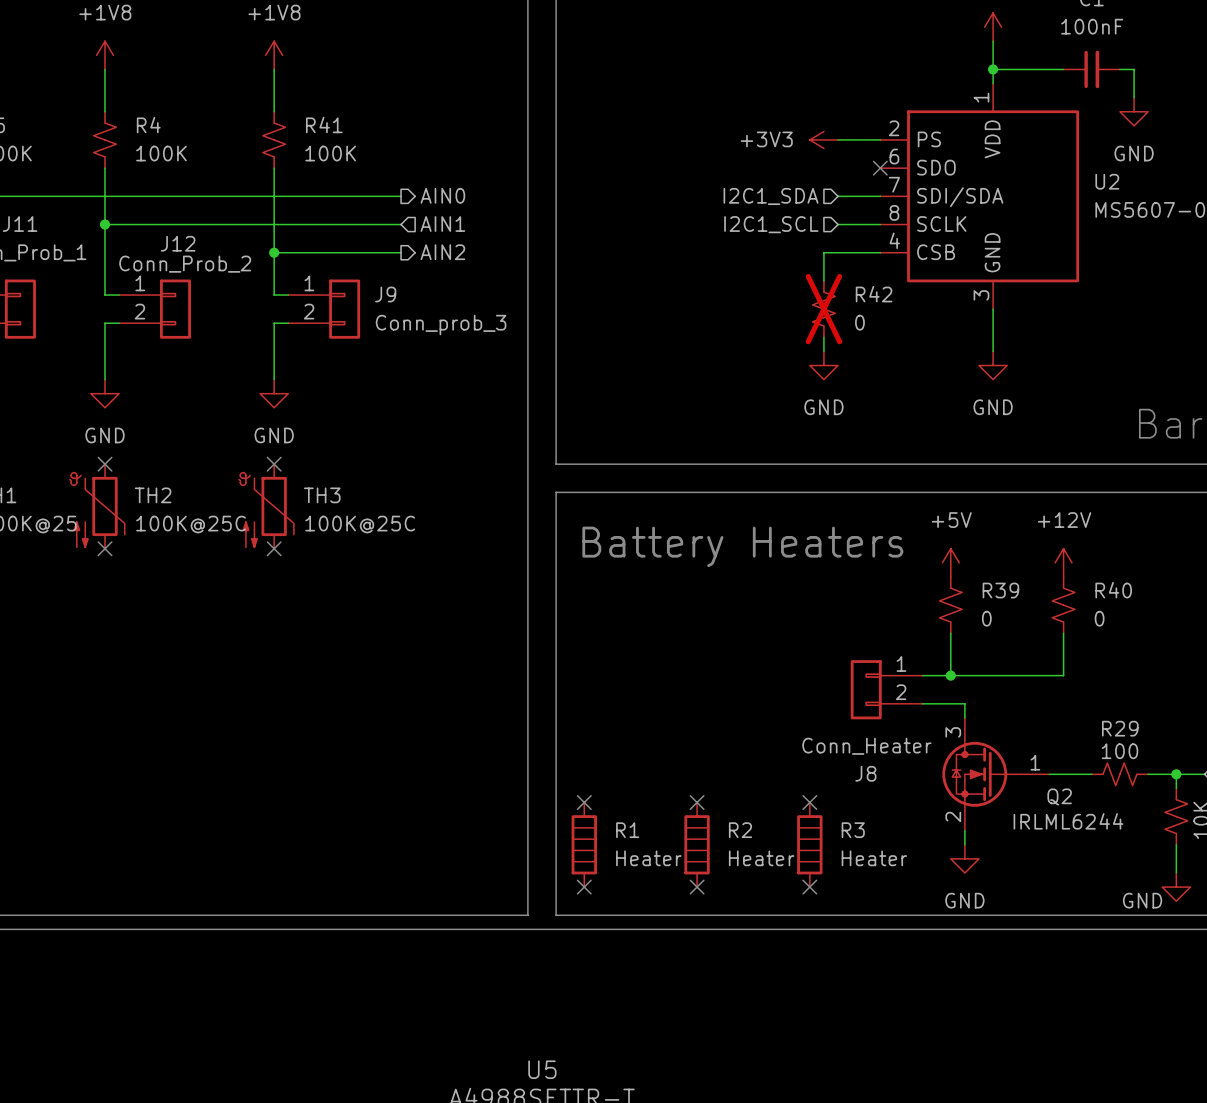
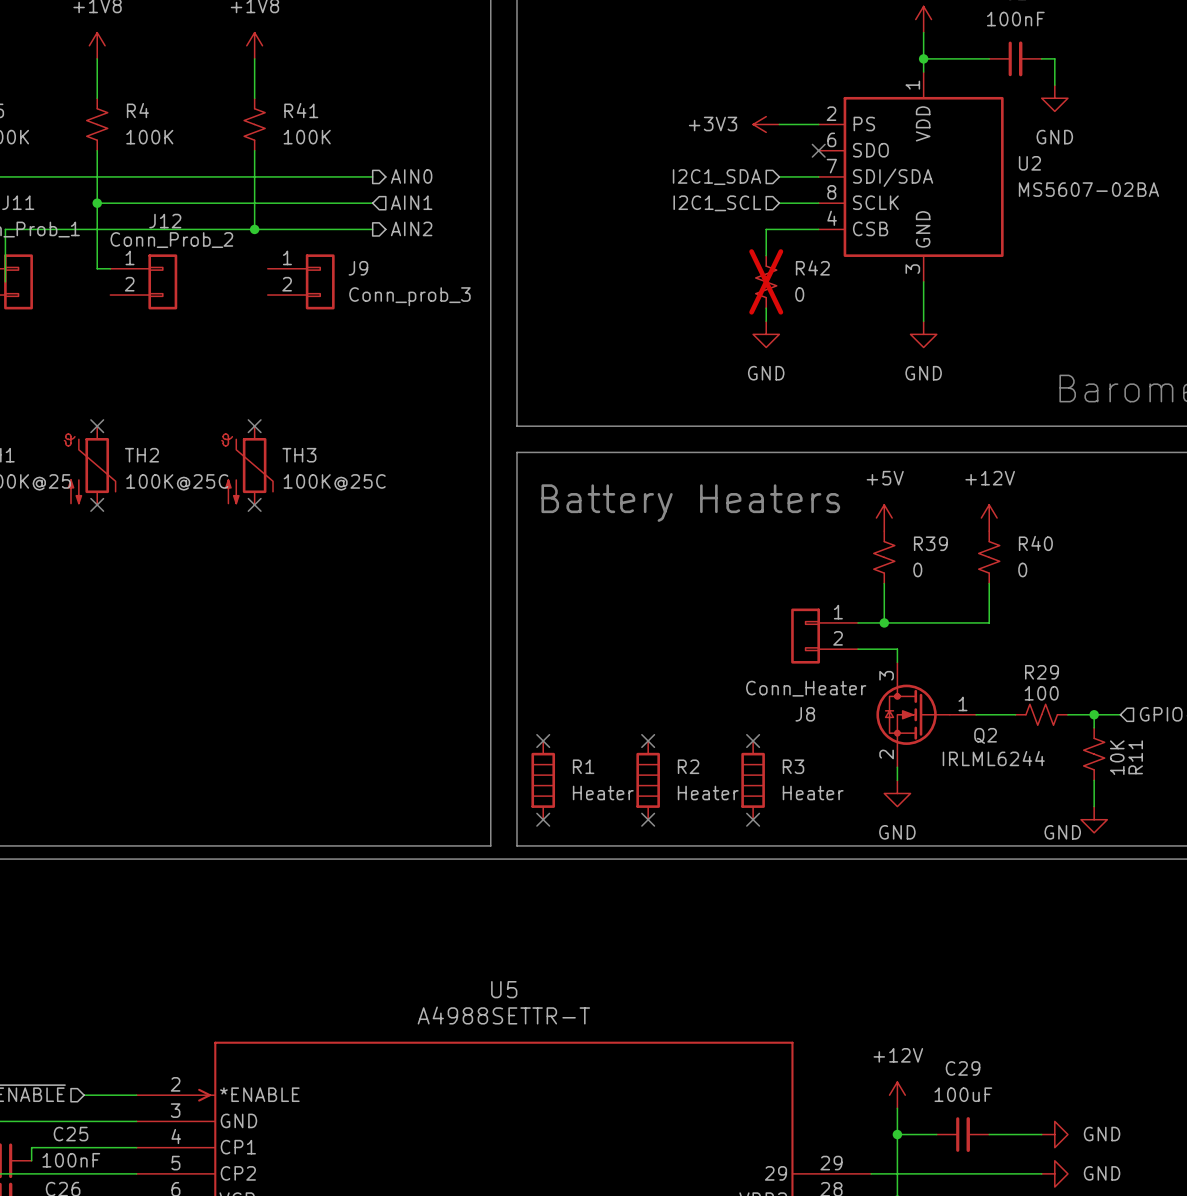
wire: (274, 252) (274, 295) (288, 295) -> (254, 229) (5, 229) (5, 281)
wire: (119, 323) (105, 323) (105, 379) -> none
wire: (288, 323) (274, 323) (274, 379) -> none
power symbol: GND (105, 393) -> none
power symbol: GND (274, 393) -> none

